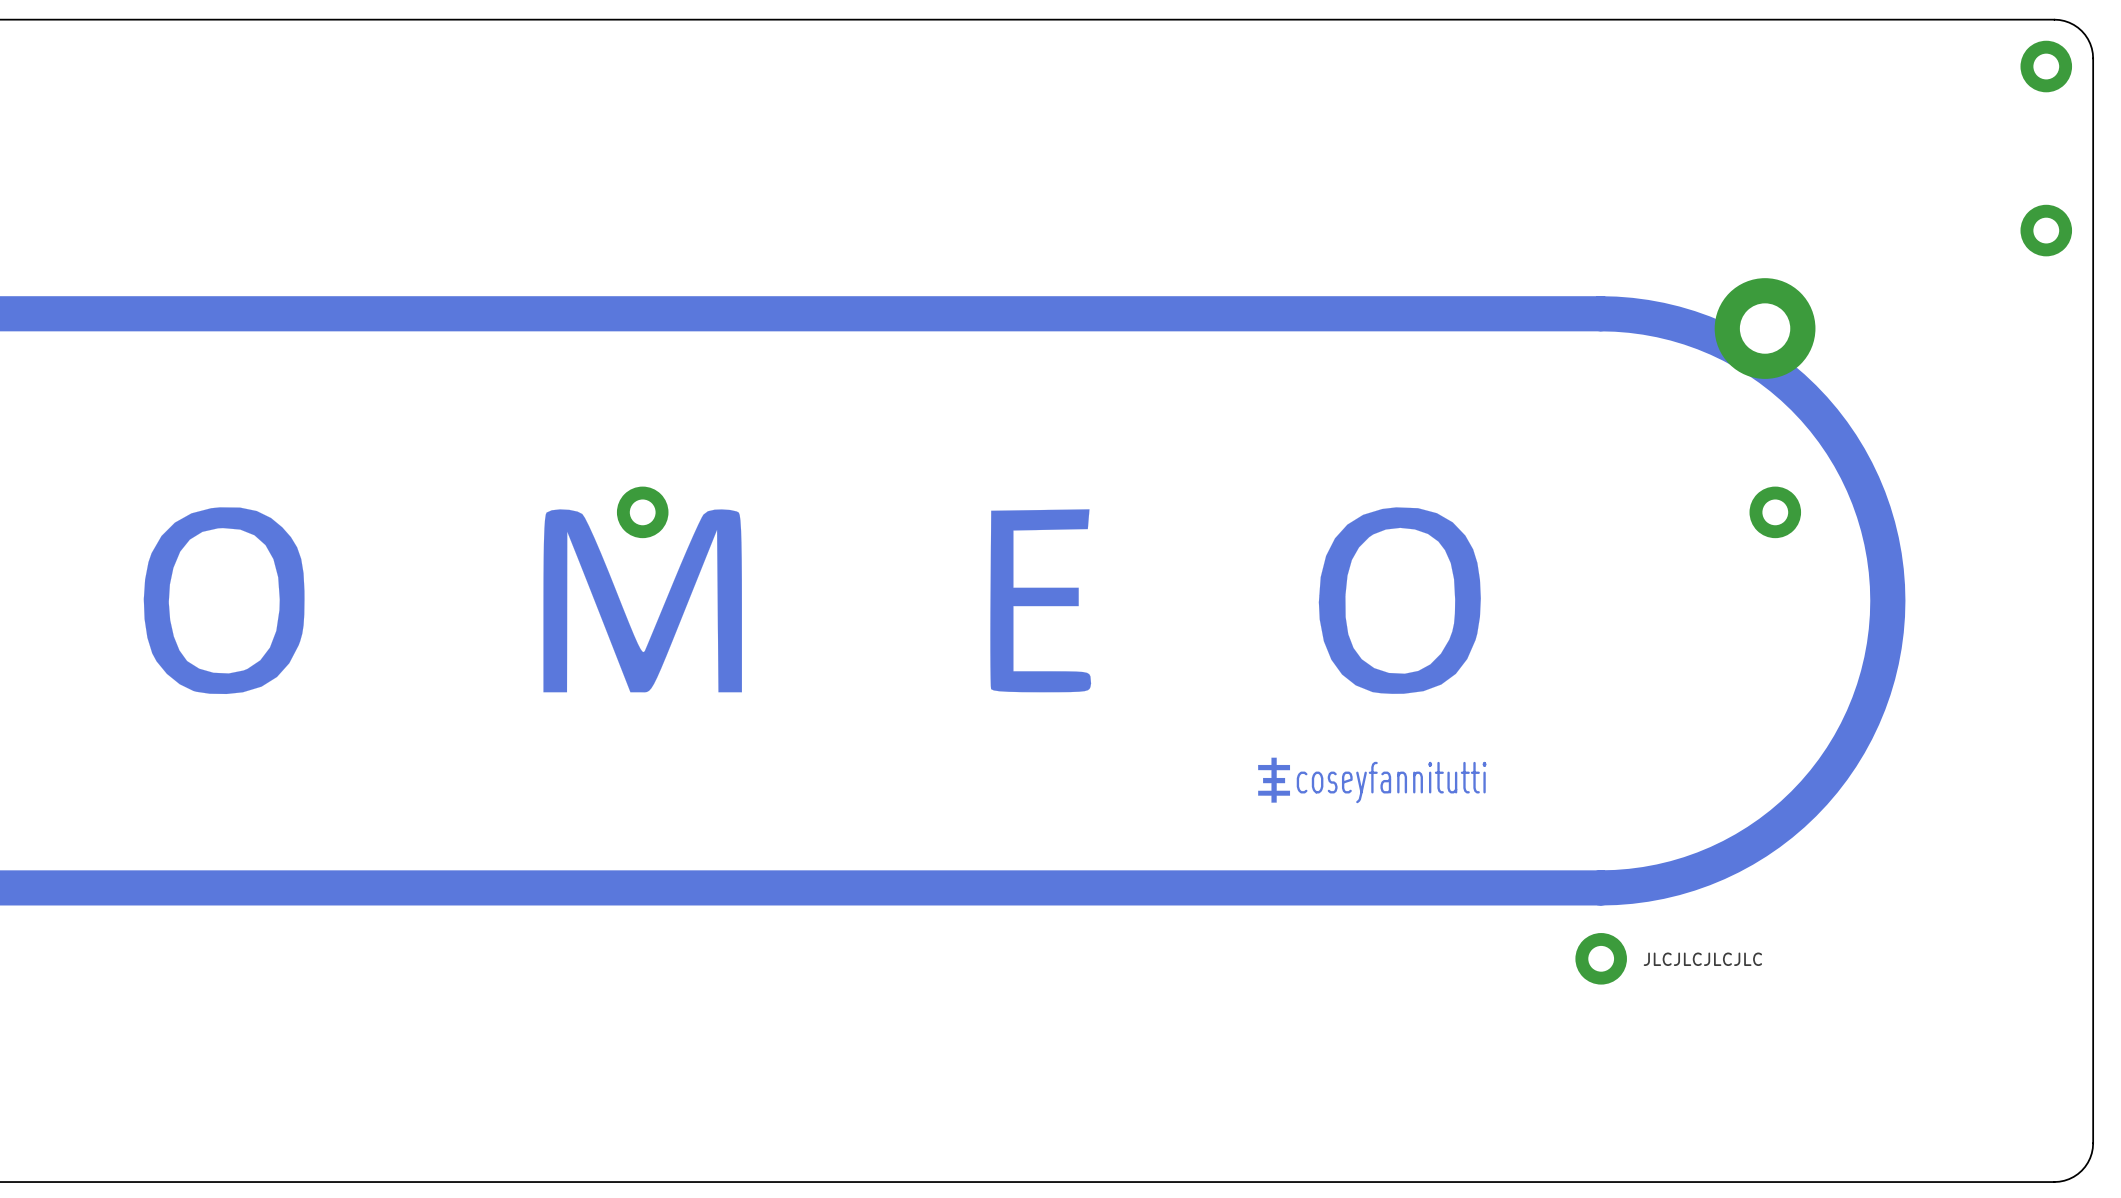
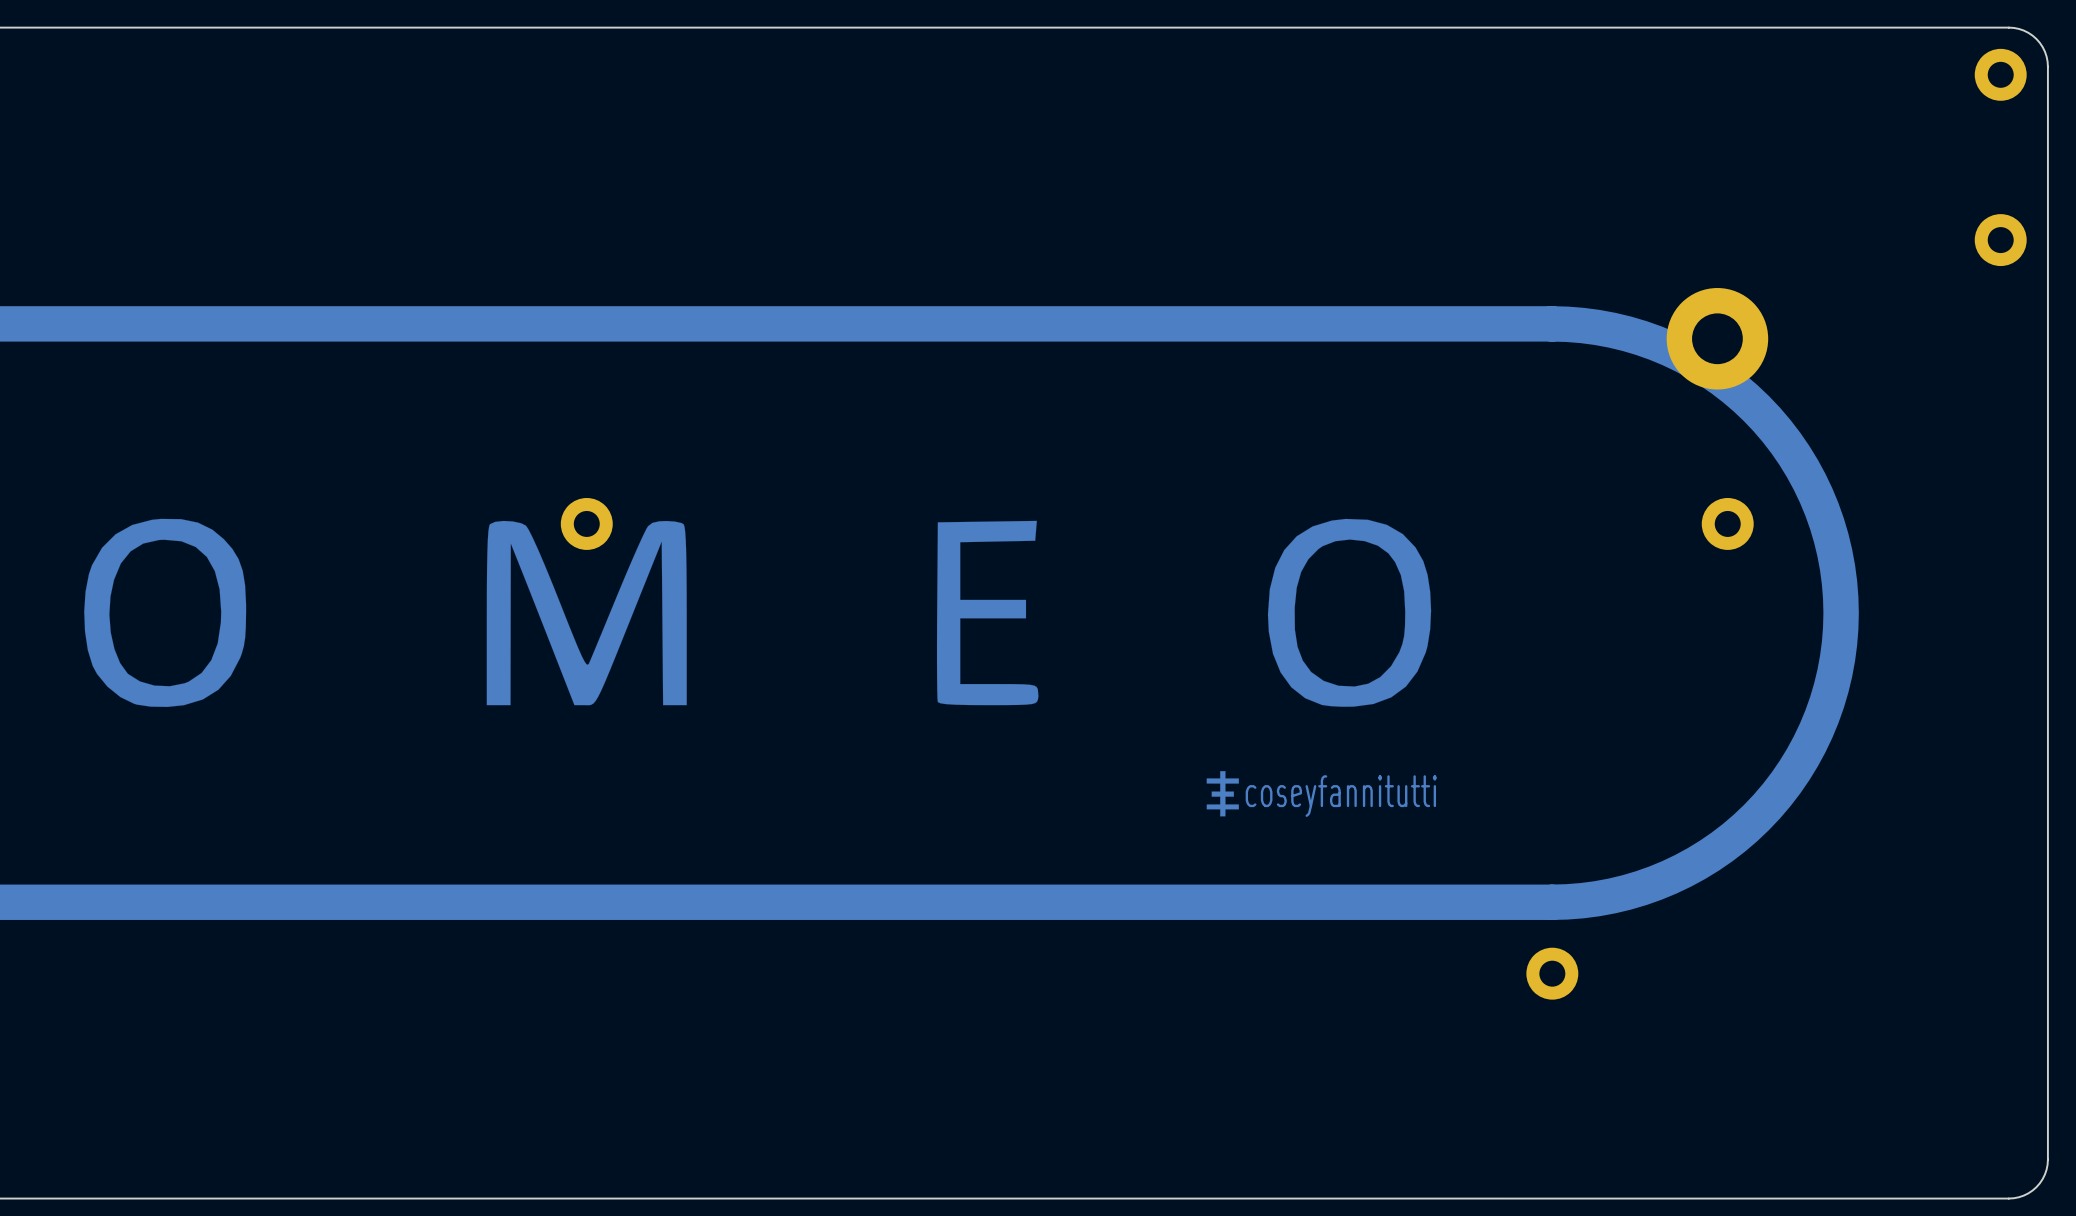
text: JLCJLCJLCJLC (1702, 959) -> none

